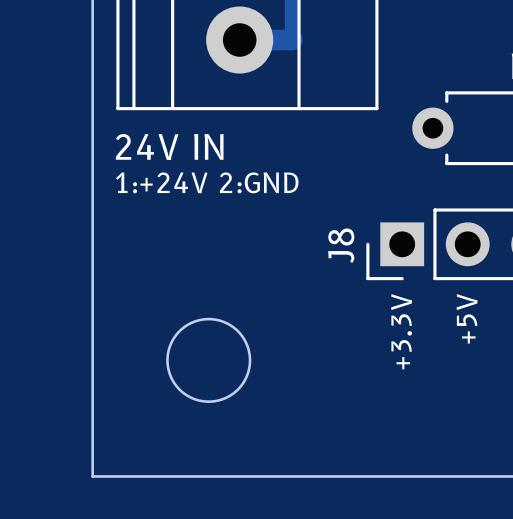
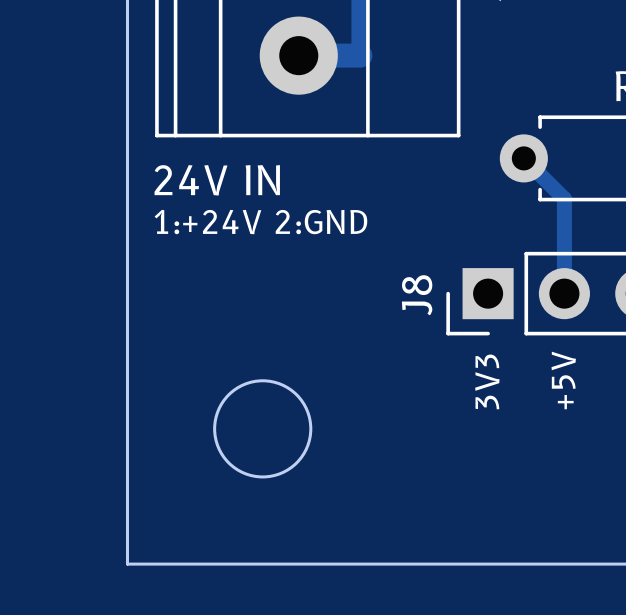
track: none -> (523, 158) (564, 198) (564, 293)
text: +3.3V (401, 331) -> 3V3 (487, 381)

